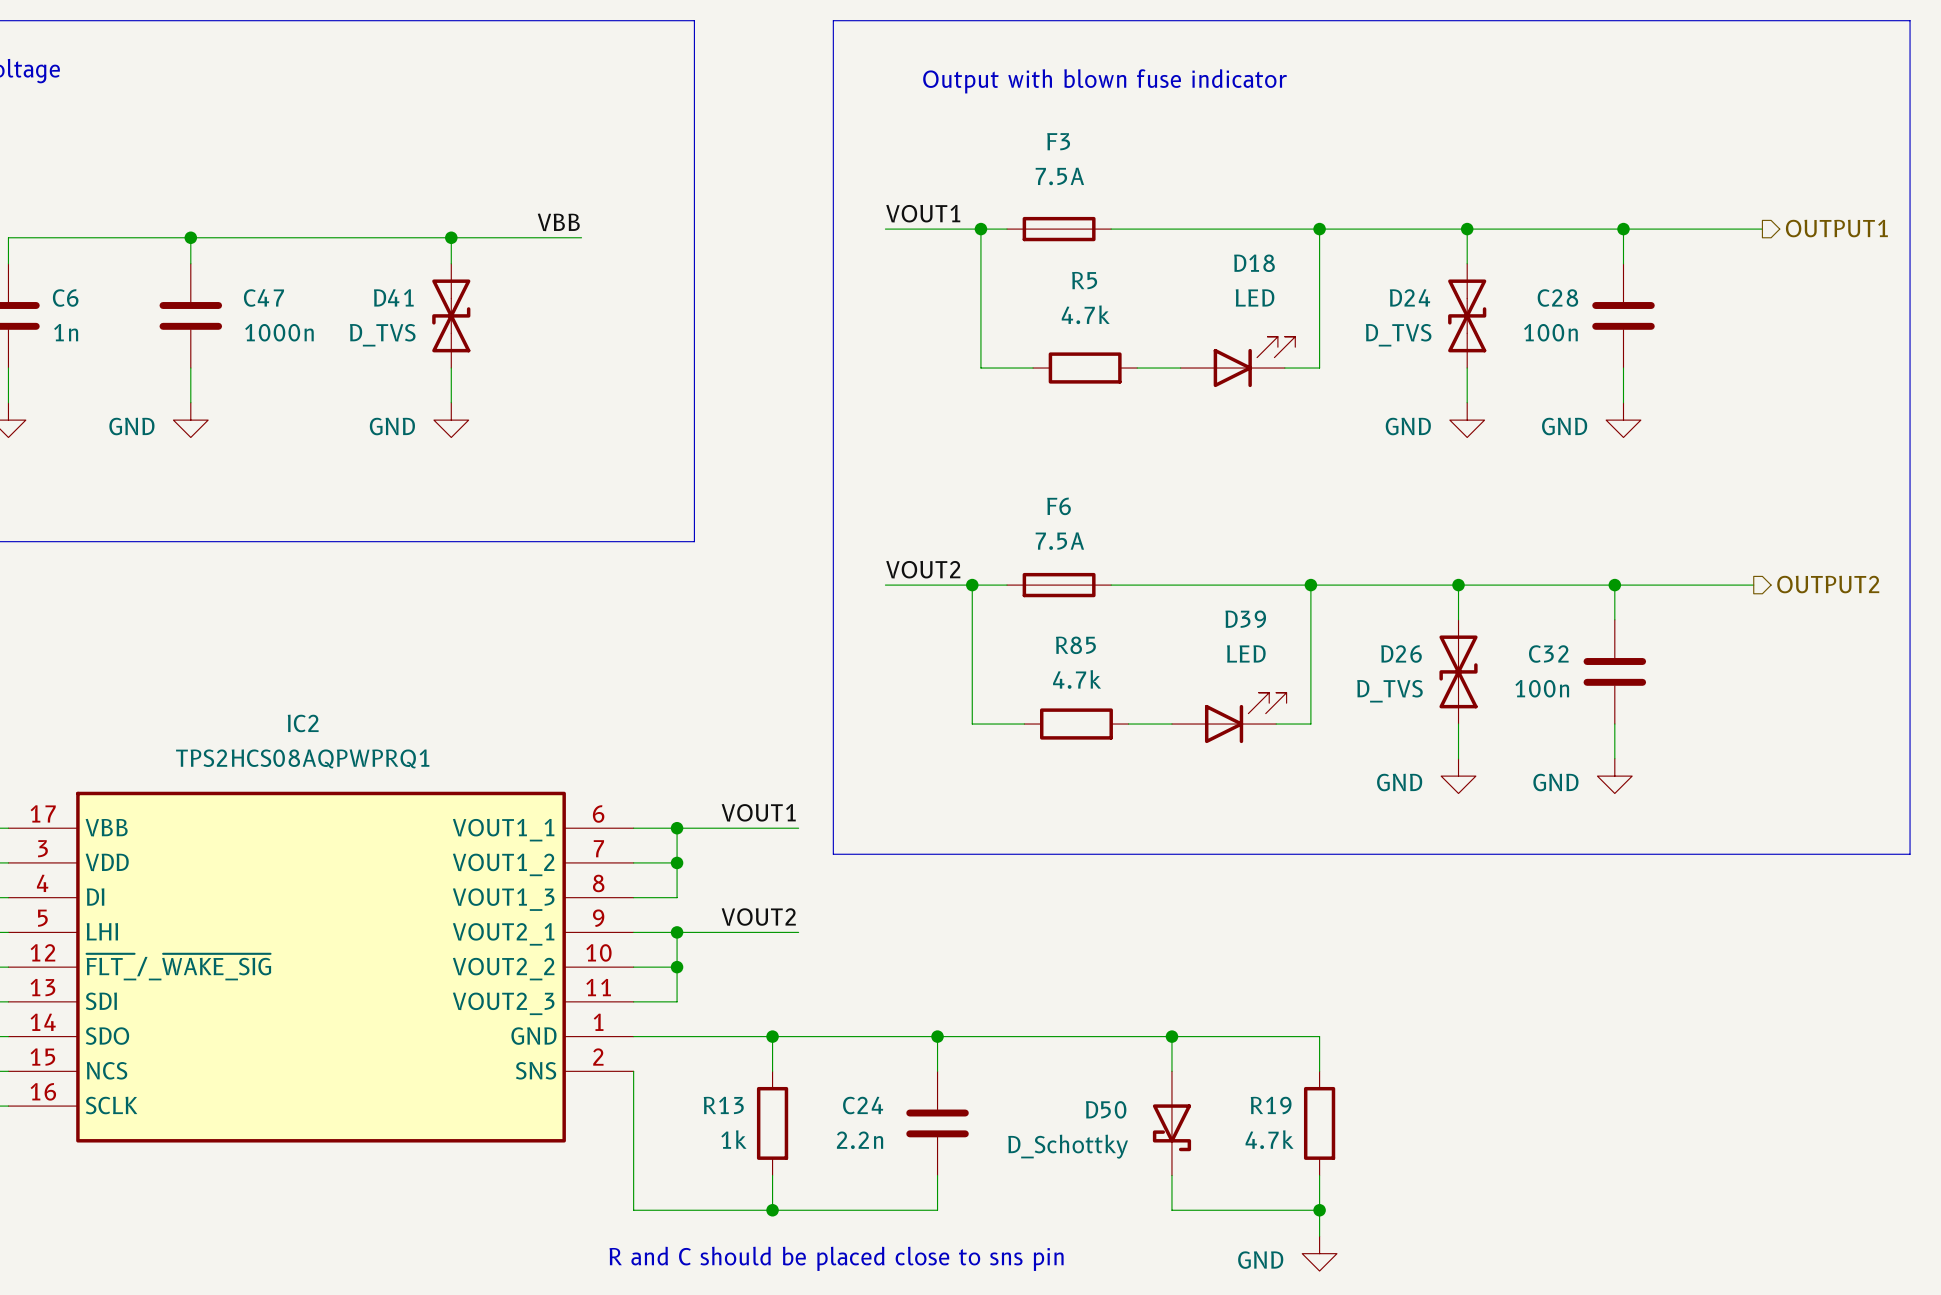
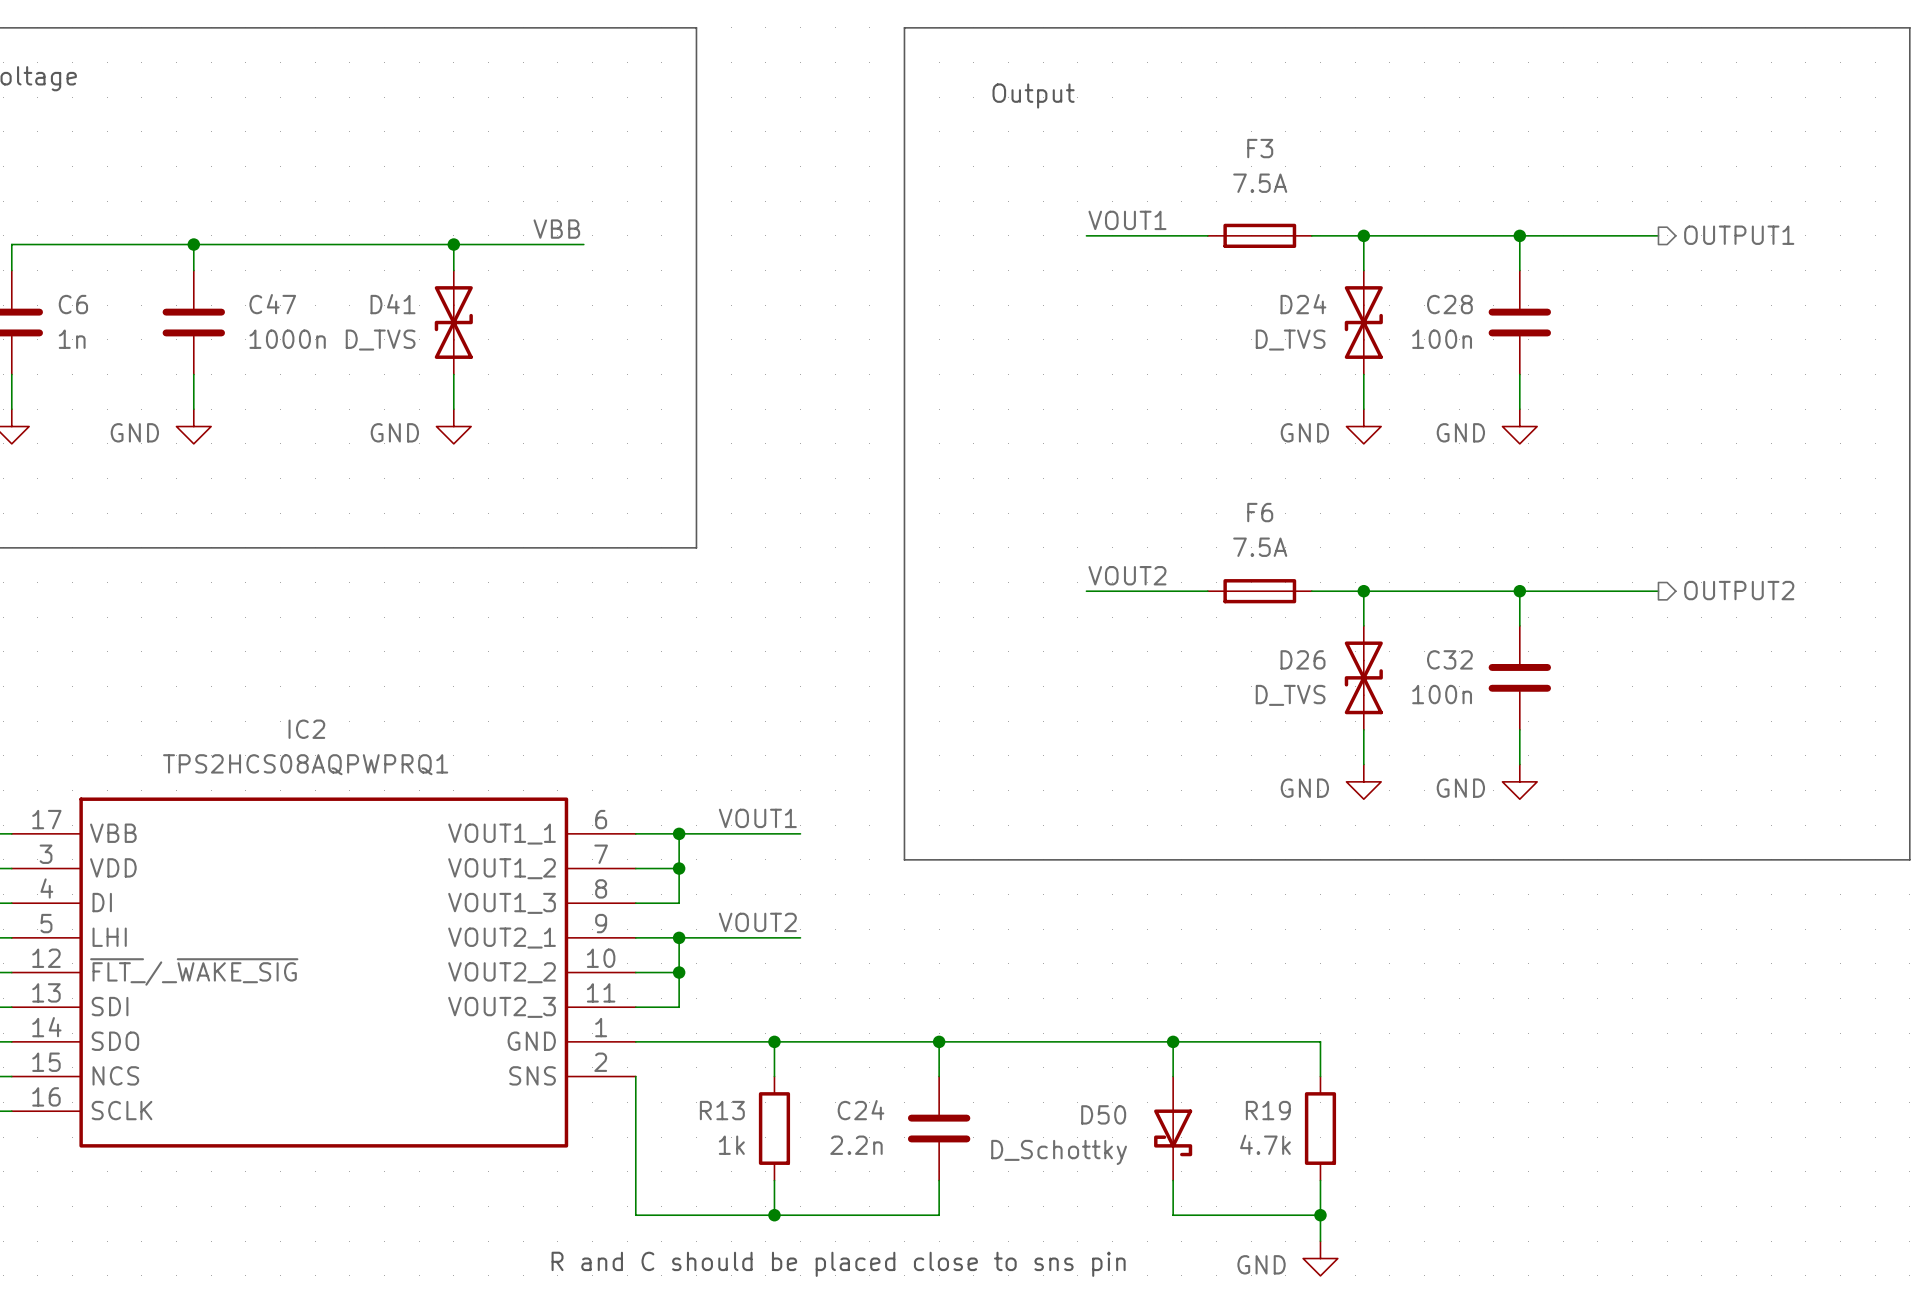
line: (902, 20) (833, 20) (833, 854) (902, 854) -> (904, 27) (904, 859)
text: Output with blown fuse indicator (1104, 81) -> none
text: none -> Output (1033, 96)
label position: VOUT1 (923, 213) -> VOUT1 (1127, 220)
hierarchical label position: OUTPUT1 (1836, 228) -> OUTPUT1 (1739, 235)
wire: (885, 229) (1007, 229) -> none
wire: (980, 229) (980, 368) (1033, 368) -> none
junction: (980, 229) -> none
F3 position: (1059, 229) -> (1259, 235)
wire: (1319, 229) (1319, 368) (1284, 368) -> none
junction position: (1319, 229) -> (1363, 235)
wire: (1467, 229) (1467, 263) -> (1363, 235) (1363, 270)
junction: (1467, 229) -> none
junction: none -> (1519, 235)
wire: (1623, 229) (1623, 263) -> (1519, 235) (1519, 270)
junction: (1623, 229) -> none
wire: (1658, 229) (1762, 229) -> none
D24 position: (1467, 315) -> (1363, 322)
C28 position: (1623, 315) -> (1519, 322)
D18: LED (1237, 361) -> none
R5: 4.7k (1085, 368) -> none
wire: (1137, 368) (1180, 368) -> none
wire: (1467, 368) (1467, 402) -> (1363, 374) (1363, 409)
wire: (1623, 368) (1623, 402) -> (1519, 374) (1519, 409)
power symbol: none -> GND (1363, 426)
power symbol: GND (1467, 420) -> none
power symbol: none -> GND (1519, 426)
power symbol: GND (1623, 420) -> none
label position: VOUT2 (923, 569) -> VOUT2 (1127, 575)
hierarchical label position: OUTPUT2 (1828, 584) -> OUTPUT2 (1739, 590)
wire: (885, 585) (1007, 585) -> none
wire: (972, 585) (972, 724) (1024, 724) -> none
junction: (972, 585) -> none
F6 position: (1059, 585) -> (1259, 591)
wire: (1206, 585) (1310, 585) (1310, 724) (1276, 724) -> none
junction: (1310, 585) -> none
junction: none -> (1363, 591)
wire: (1458, 585) (1458, 619) -> (1363, 591) (1363, 625)
junction: (1458, 585) -> none
junction: none -> (1519, 591)
wire: (1614, 585) (1614, 619) -> (1519, 591) (1519, 625)
junction: (1614, 585) -> none
wire: (1658, 585) (1753, 585) -> none
D26 position: (1458, 671) -> (1363, 677)
C32 position: (1614, 671) -> (1519, 677)
D39: LED (1229, 717) -> none
R85: 4.7k (1076, 724) -> none
wire: (1128, 724) (1171, 724) -> none
wire: (1458, 724) (1458, 758) -> (1363, 729) (1363, 764)
wire: (1614, 724) (1614, 758) -> (1519, 729) (1519, 764)
power symbol: none -> GND (1363, 781)
power symbol: GND (1458, 776) -> none
power symbol: none -> GND (1519, 781)
power symbol: GND (1614, 776) -> none

